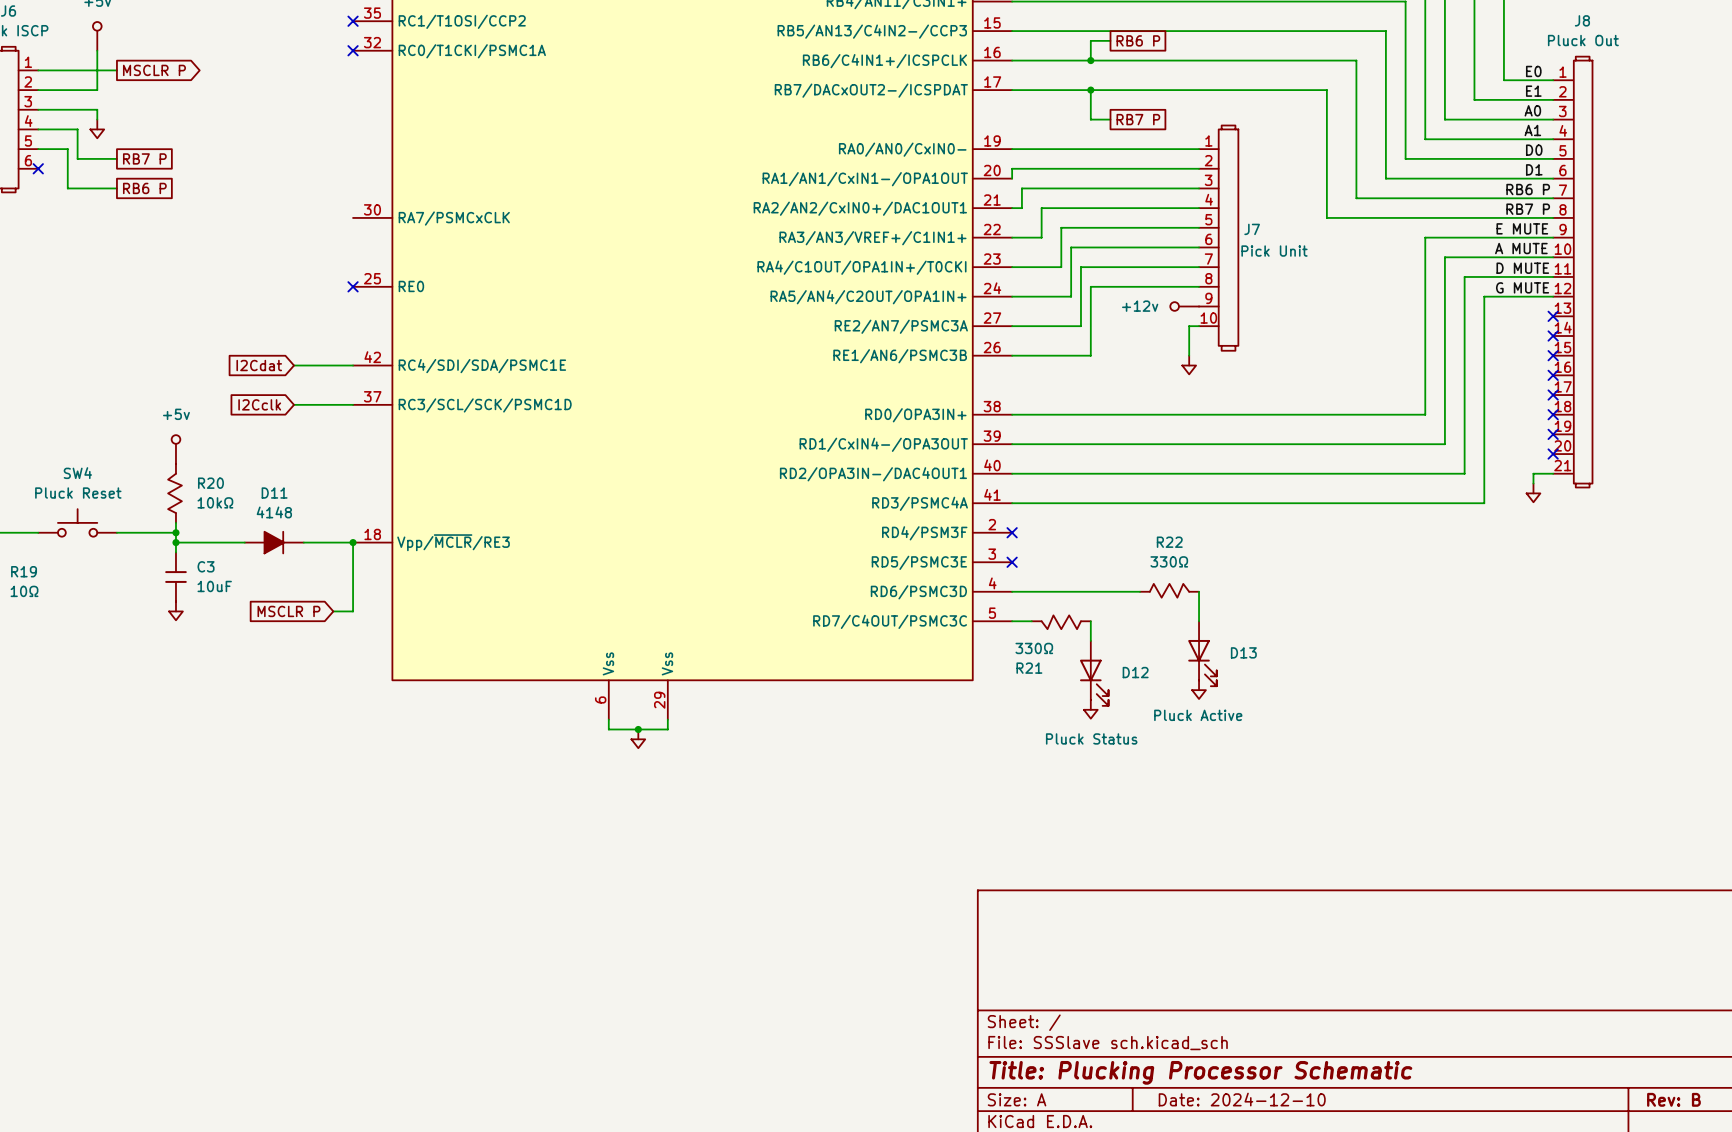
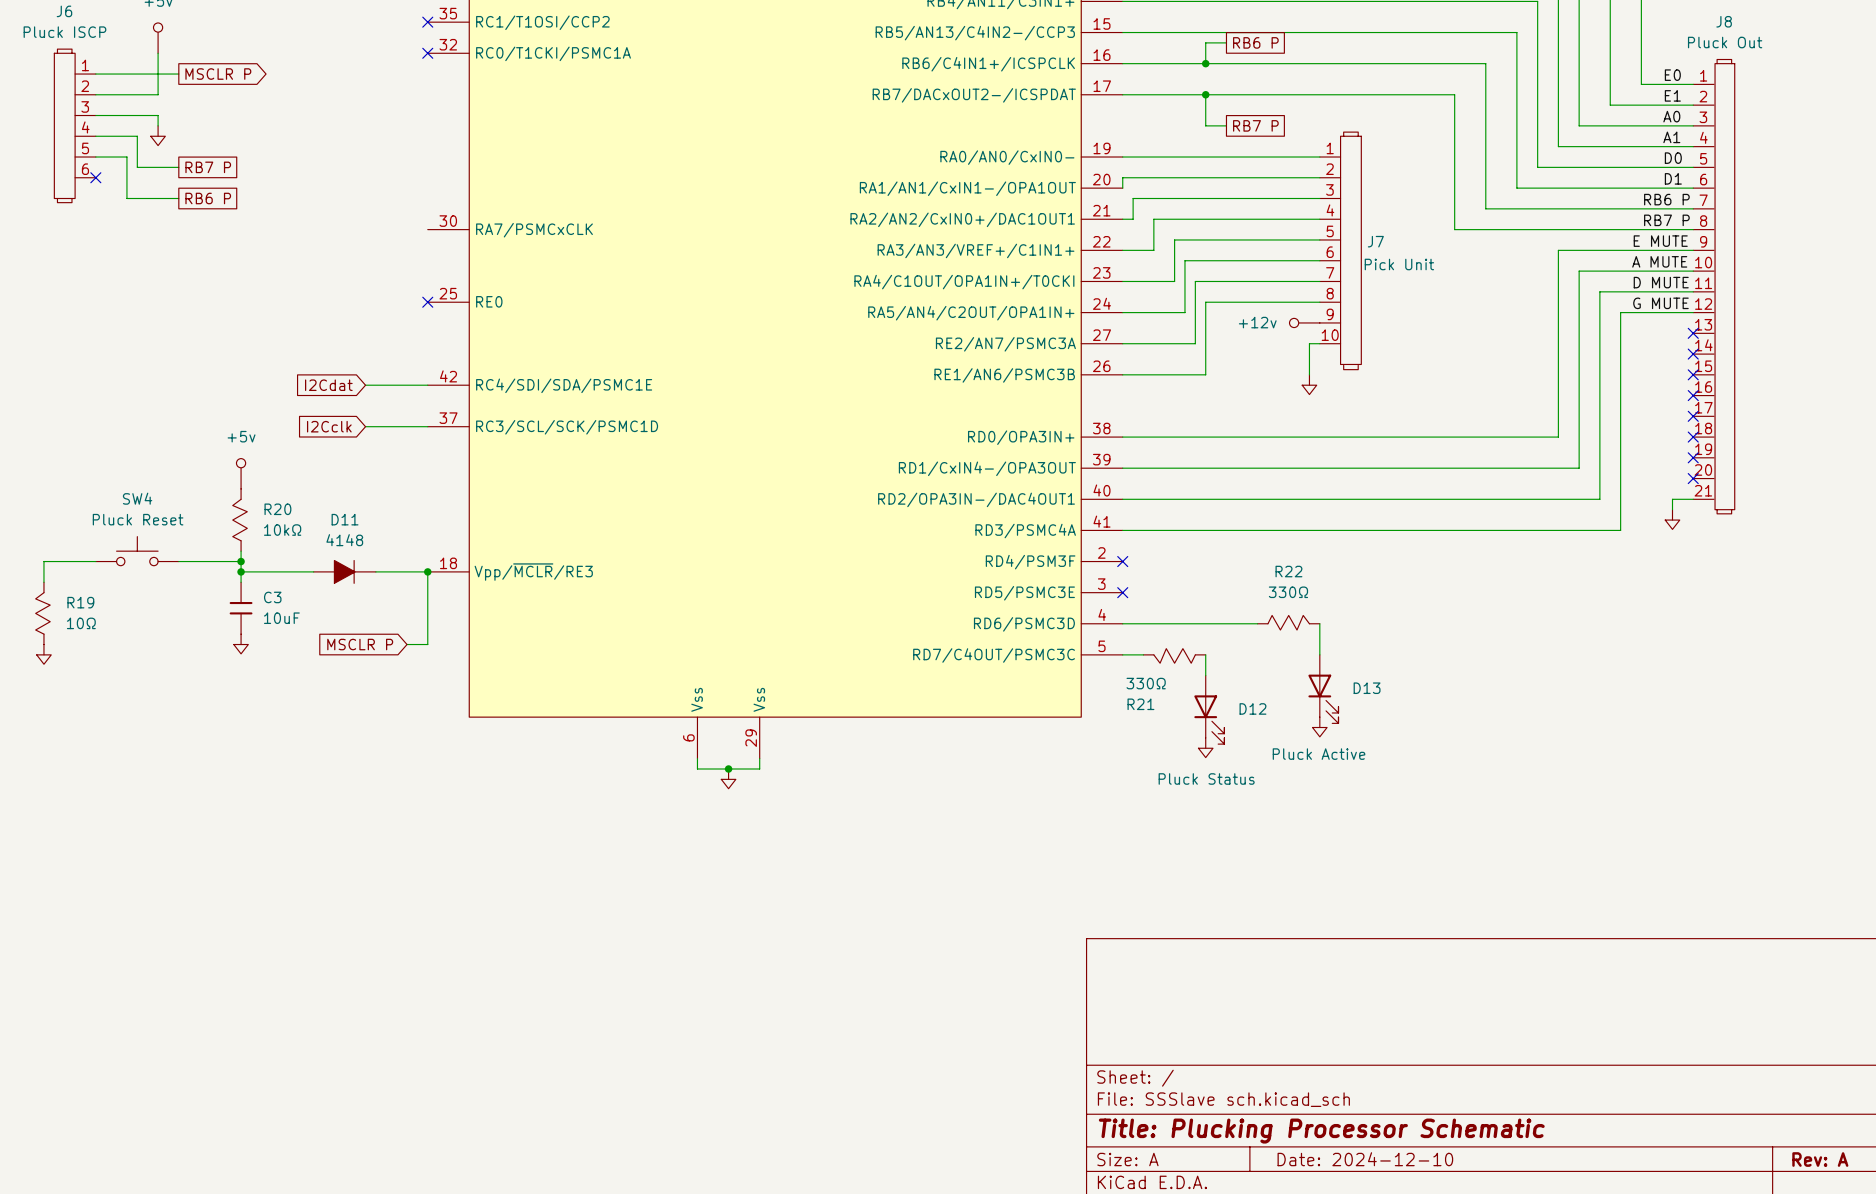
title block: Rev: B (1673, 1099) -> Rev: A (1820, 1159)

